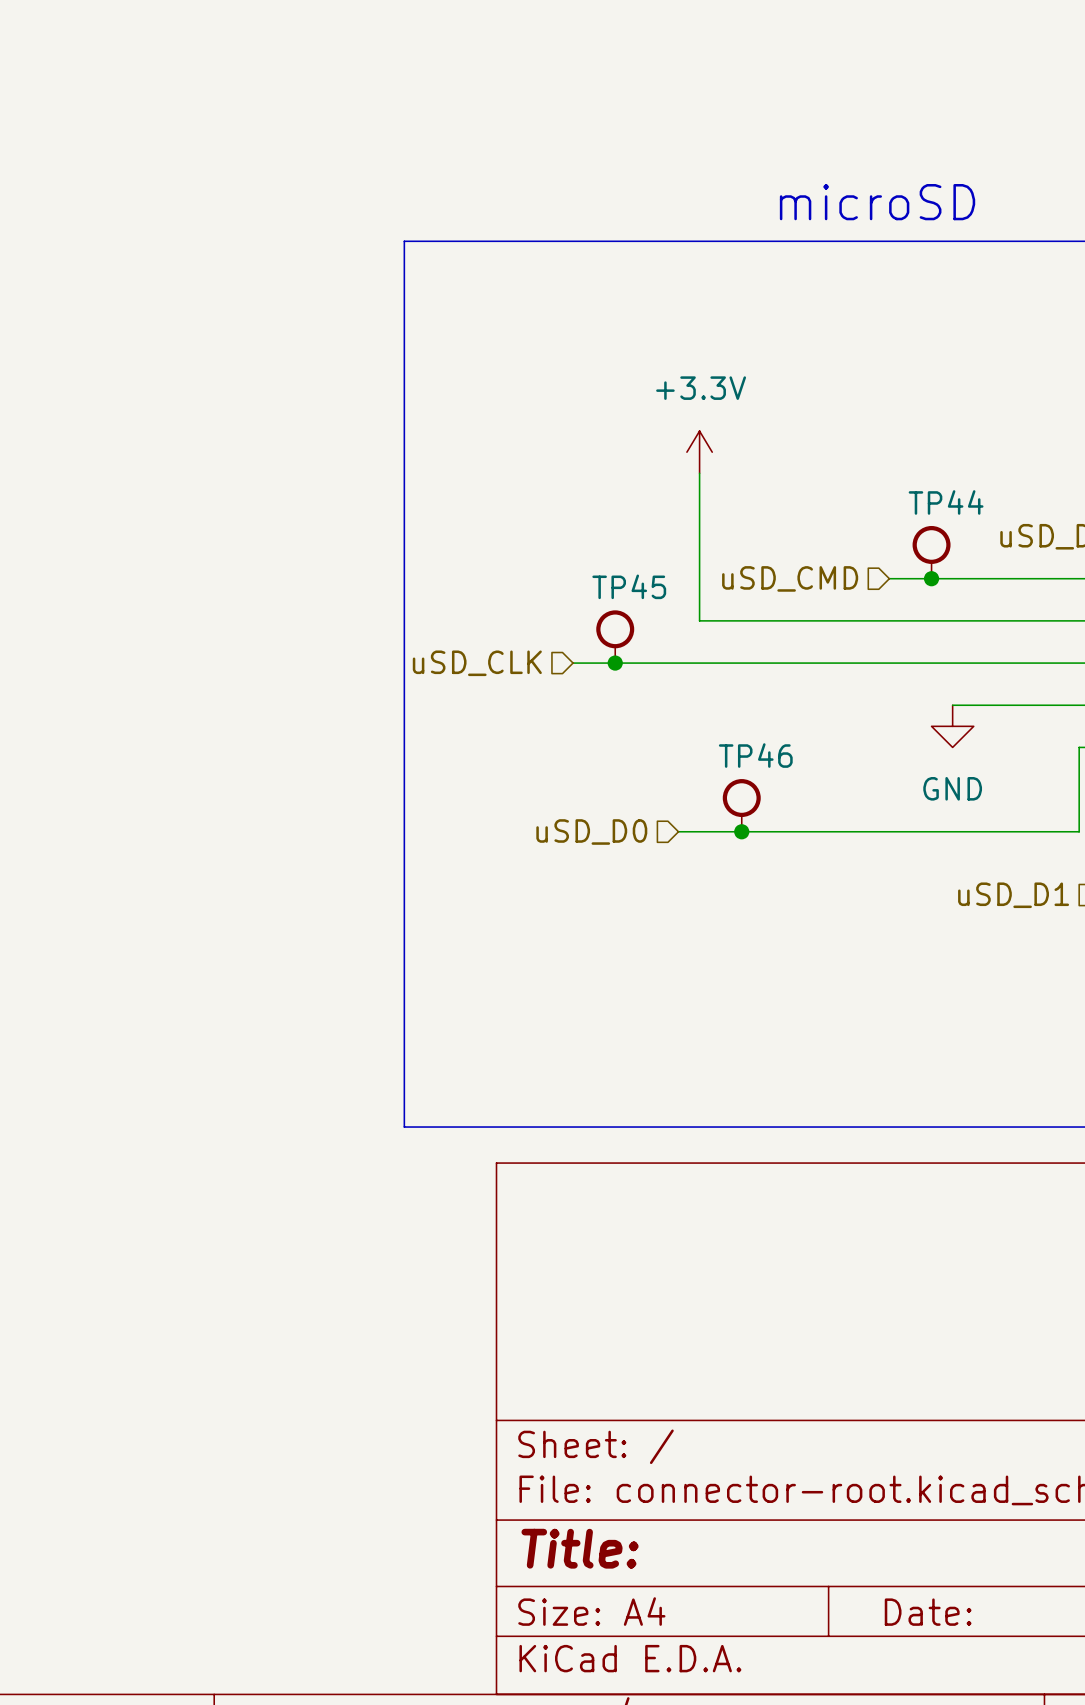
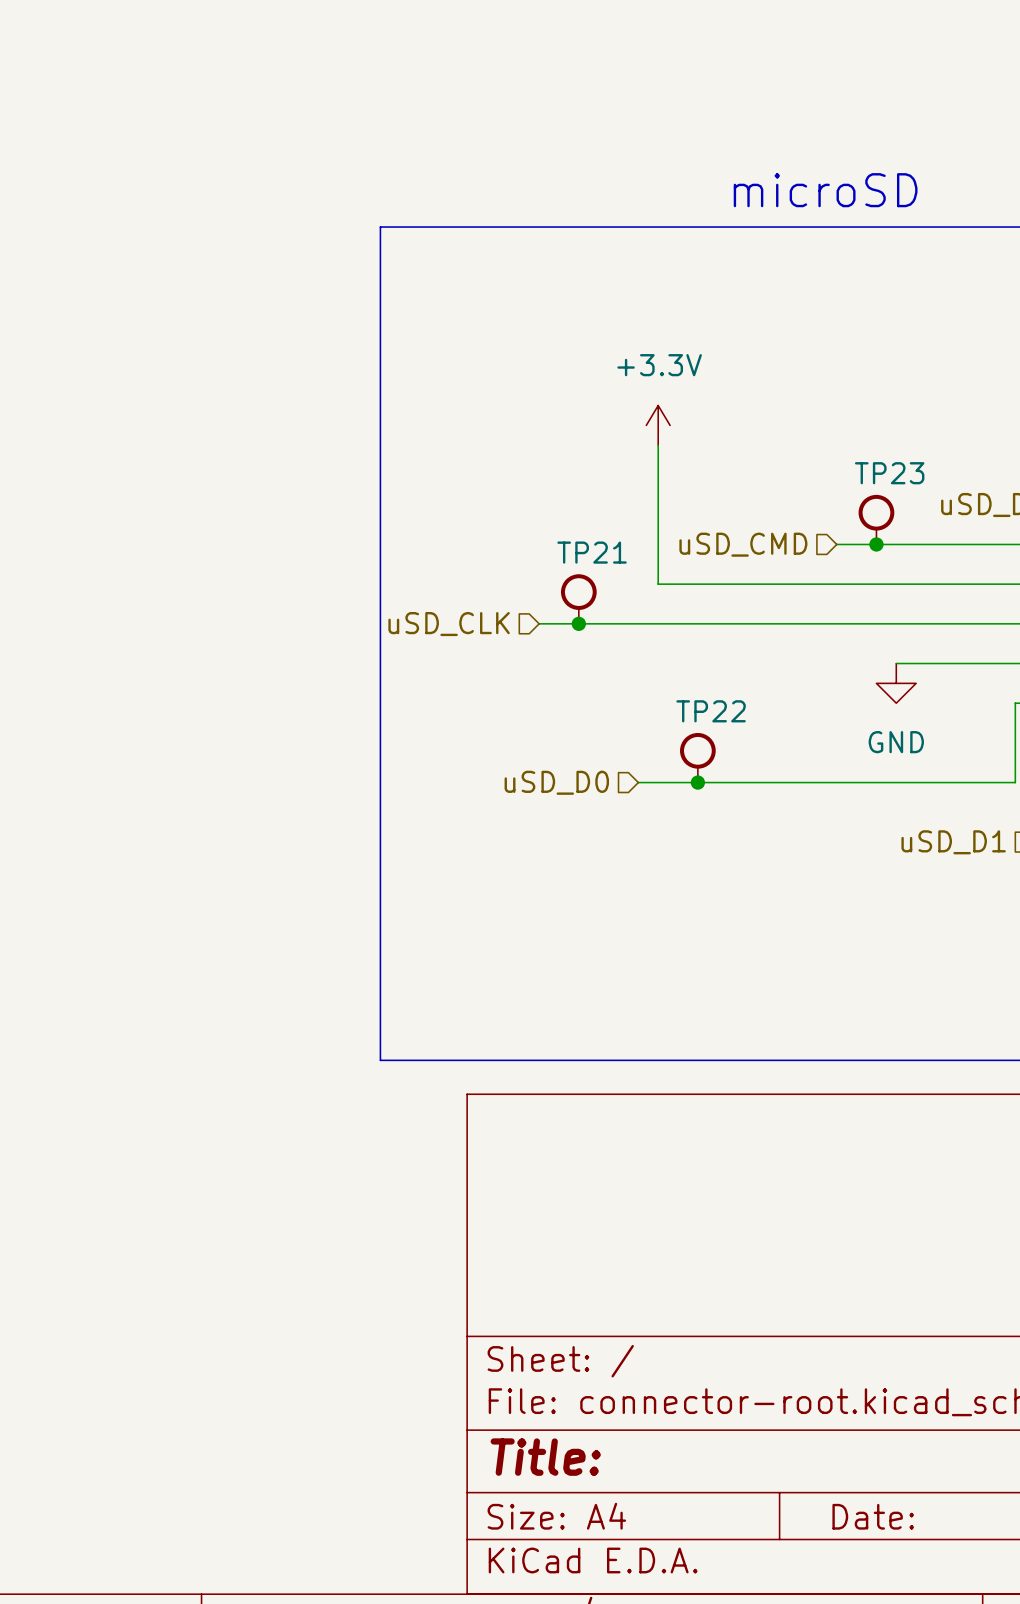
TP44 name: TP44 (946, 502) -> TP23 (889, 473)
TP45 name: TP45 (629, 586) -> TP21 (592, 552)
TP46 name: TP46 (755, 755) -> TP22 (711, 711)

